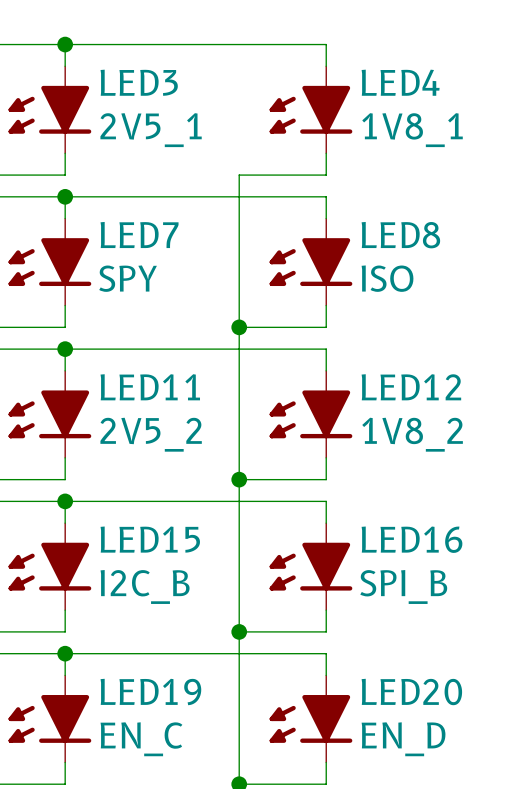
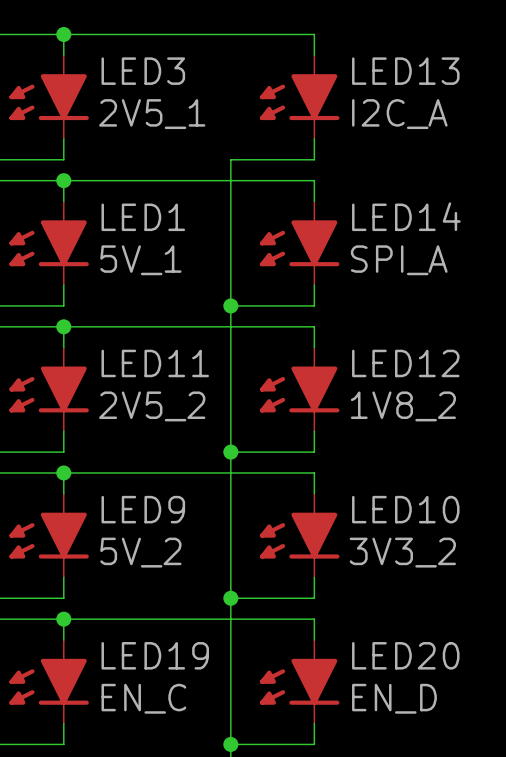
LED4 name: LED4 (400, 82) -> LED13 (405, 71)
LED4 value: 1V8_1 (412, 130) -> I2C_A (399, 114)
LED7 name: LED7 (139, 235) -> LED1 (143, 217)
LED8 name: LED8 (400, 235) -> LED14 (406, 216)
LED7 value: SPY (128, 278) -> 5V_1 (140, 260)
LED8 value: ISO (387, 278) -> SPI_A (399, 260)
LED15 name: LED15 (150, 539) -> LED9 (143, 509)
LED16 name: LED16 (412, 539) -> LED10 (405, 509)
LED15 value: I2C_B (145, 586) -> 5V_2 (140, 552)
LED16 value: SPI_B (403, 586) -> 3V3_2 (402, 552)

